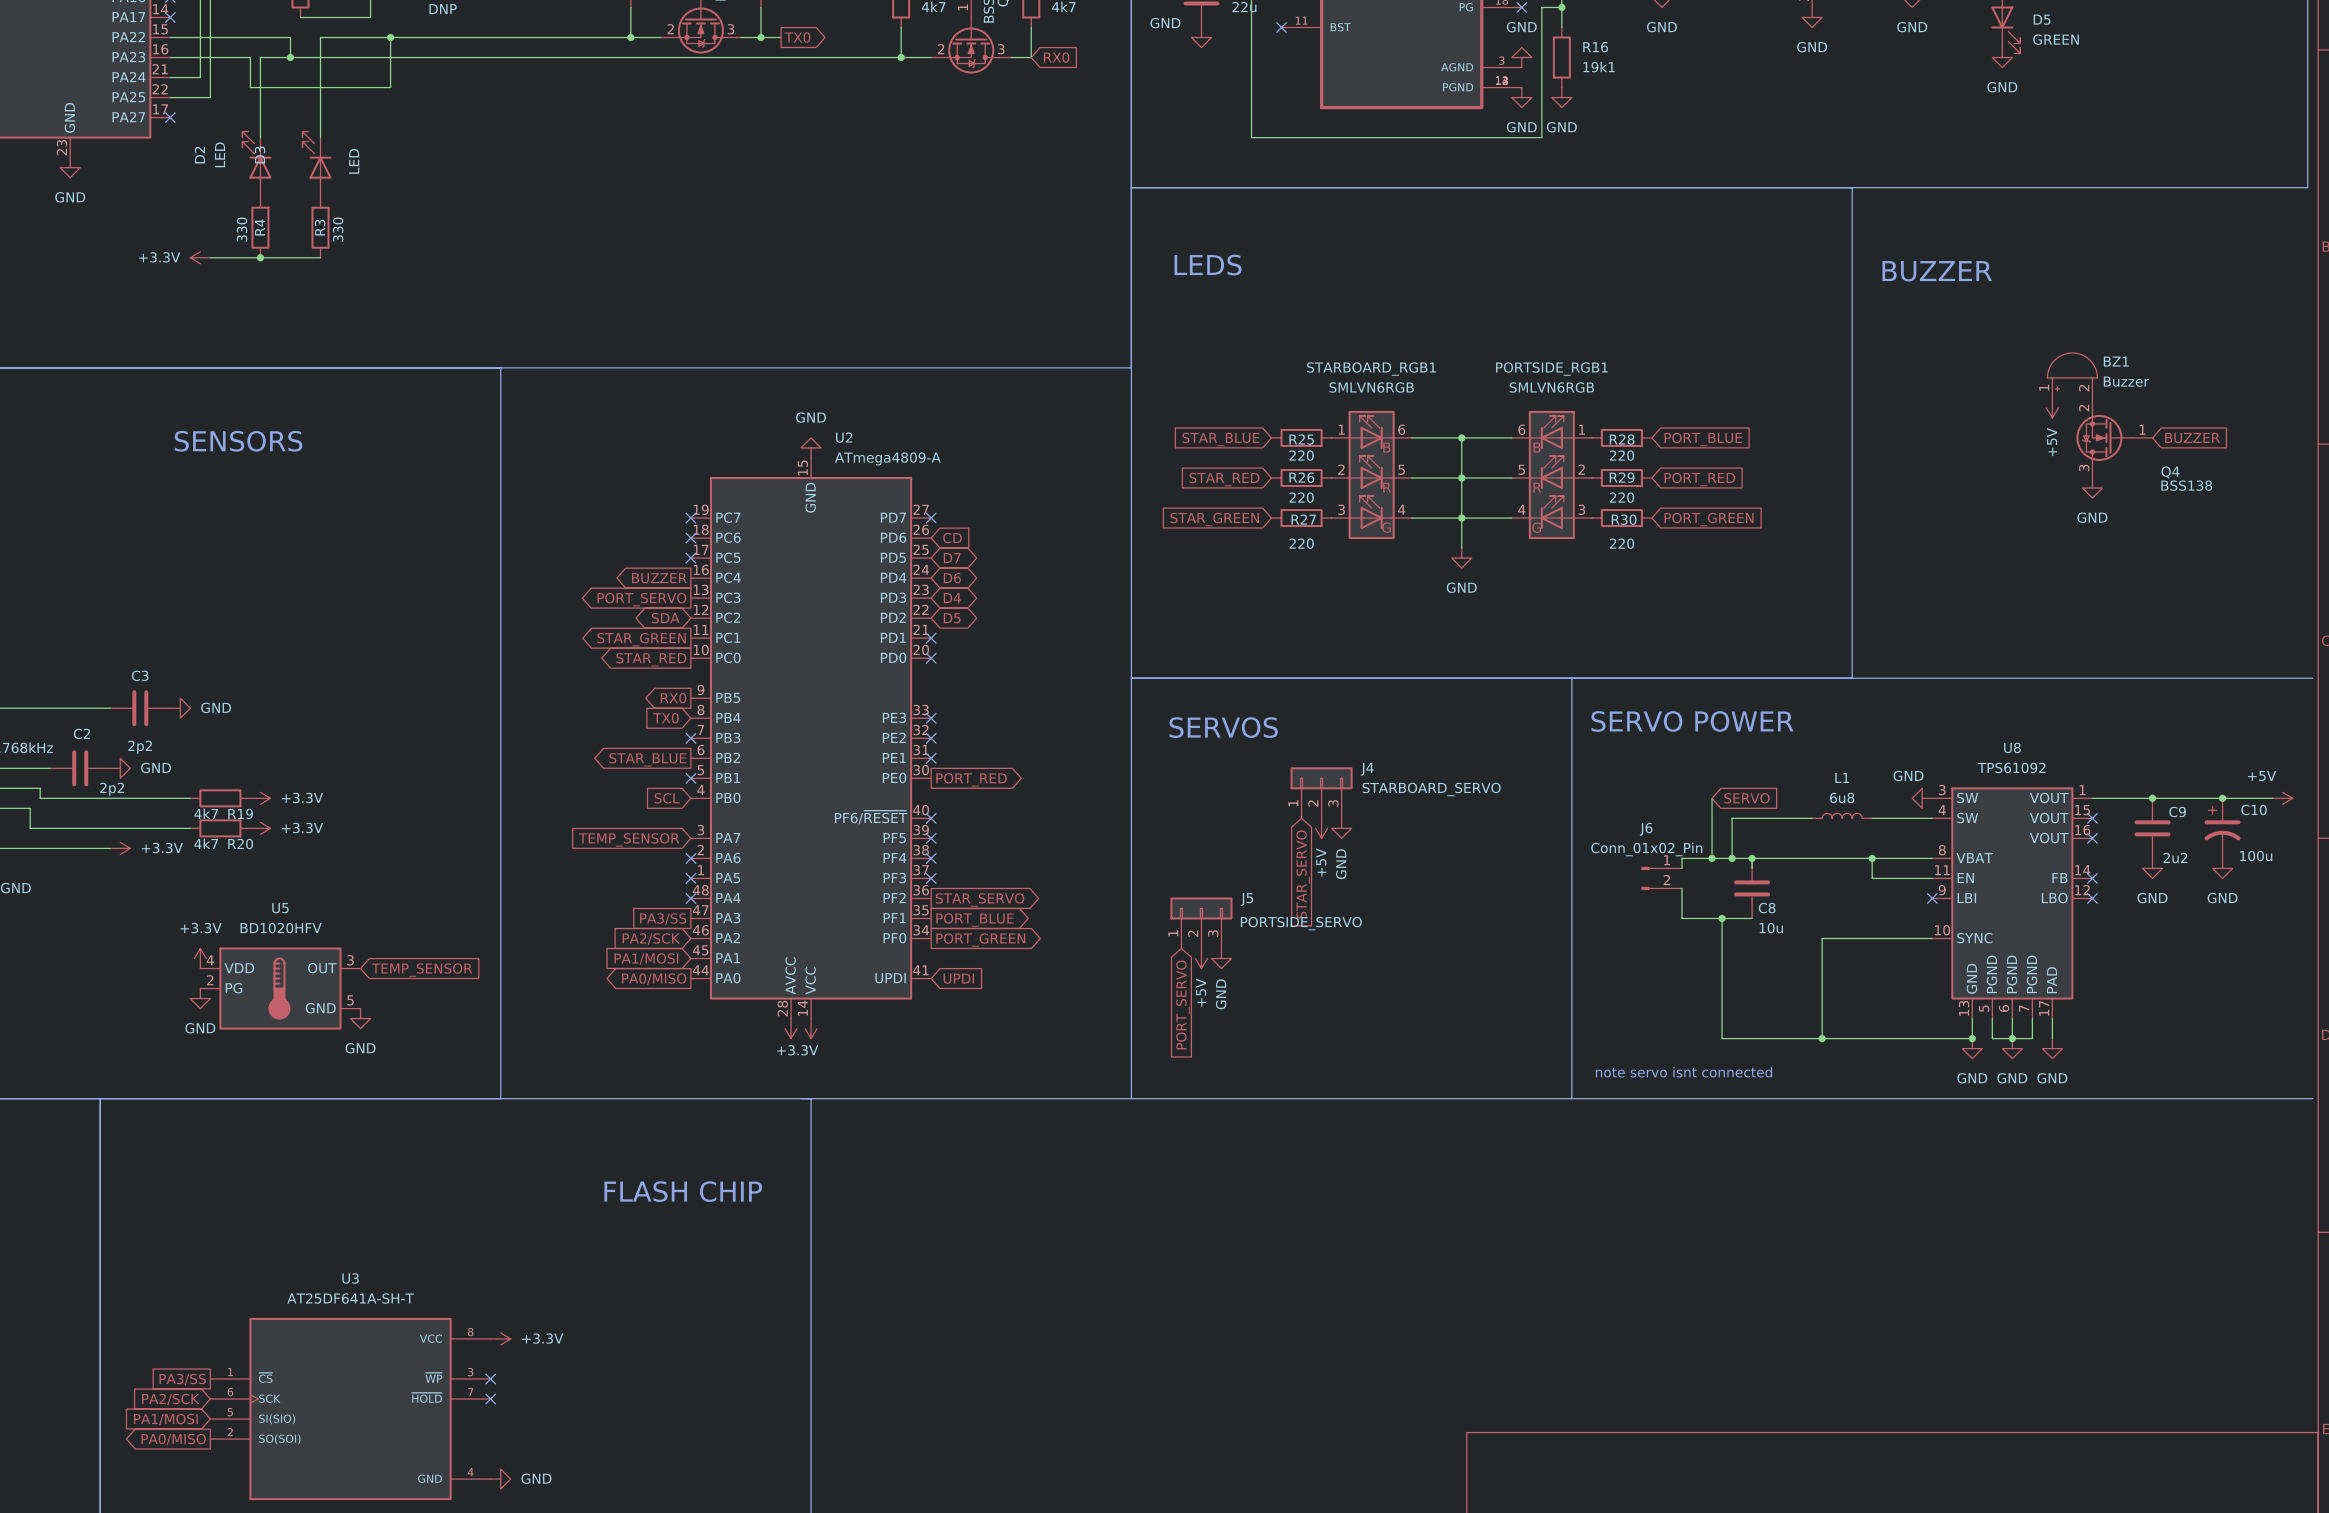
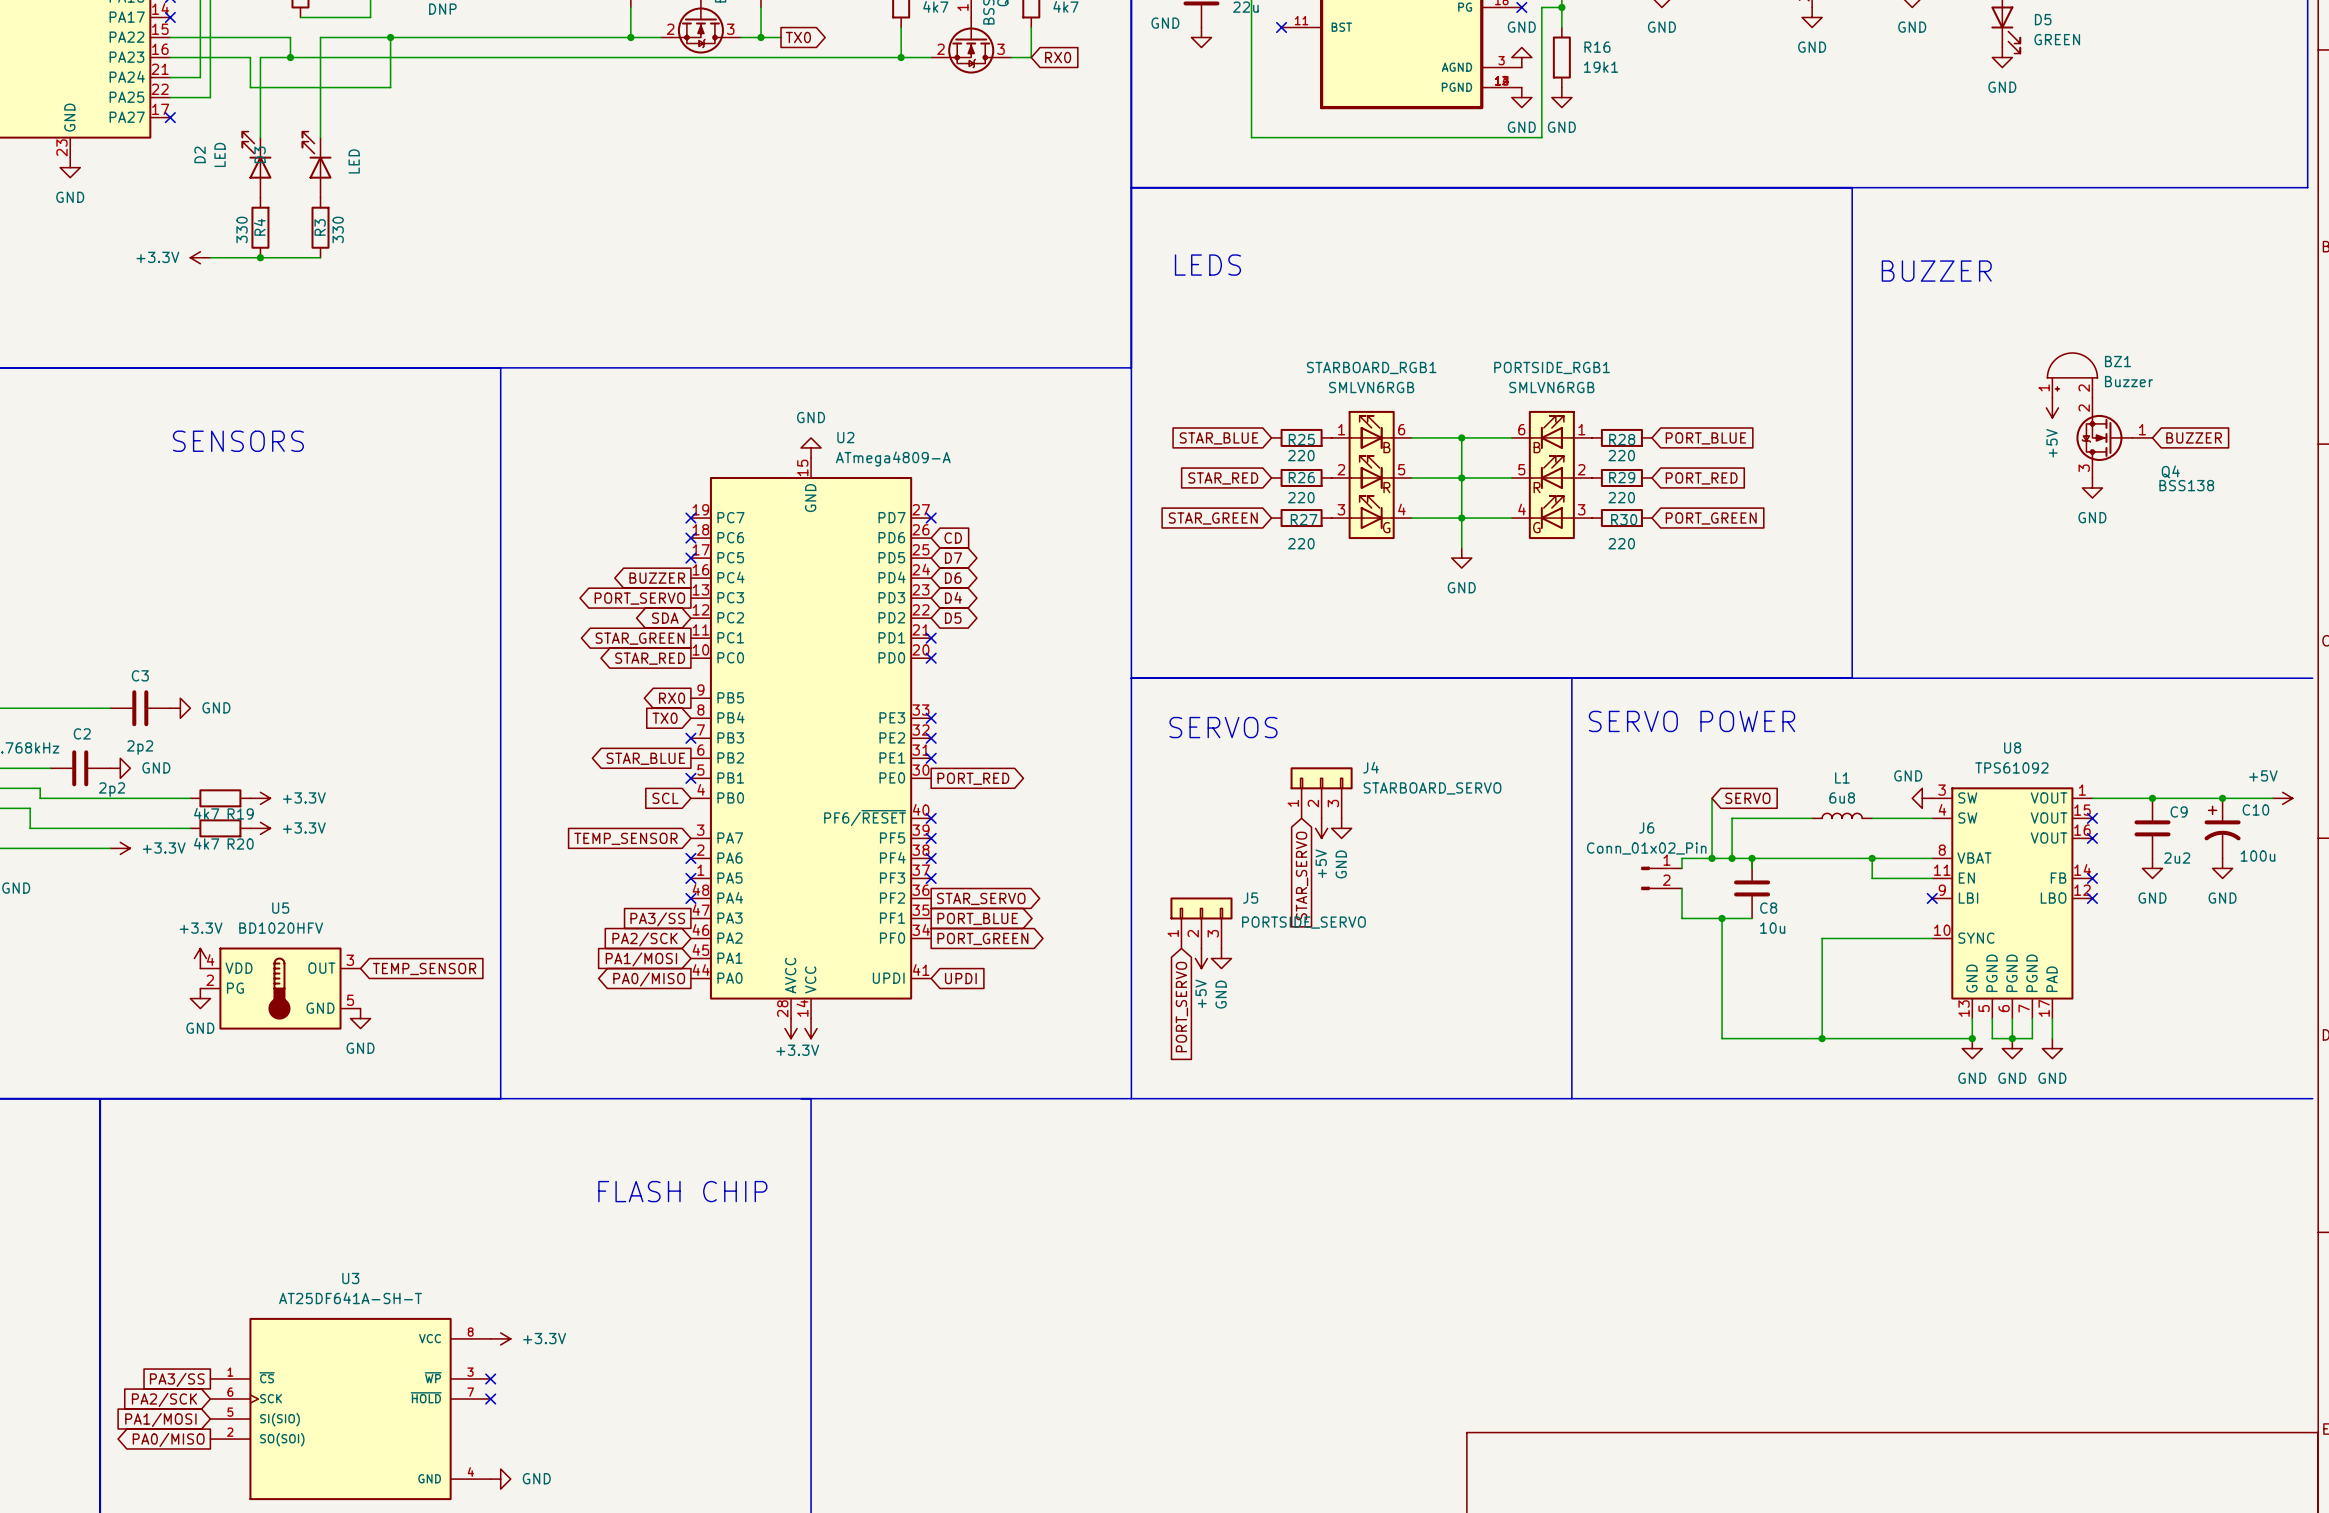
text: note servo isnt connected (1683, 1072) -> none

